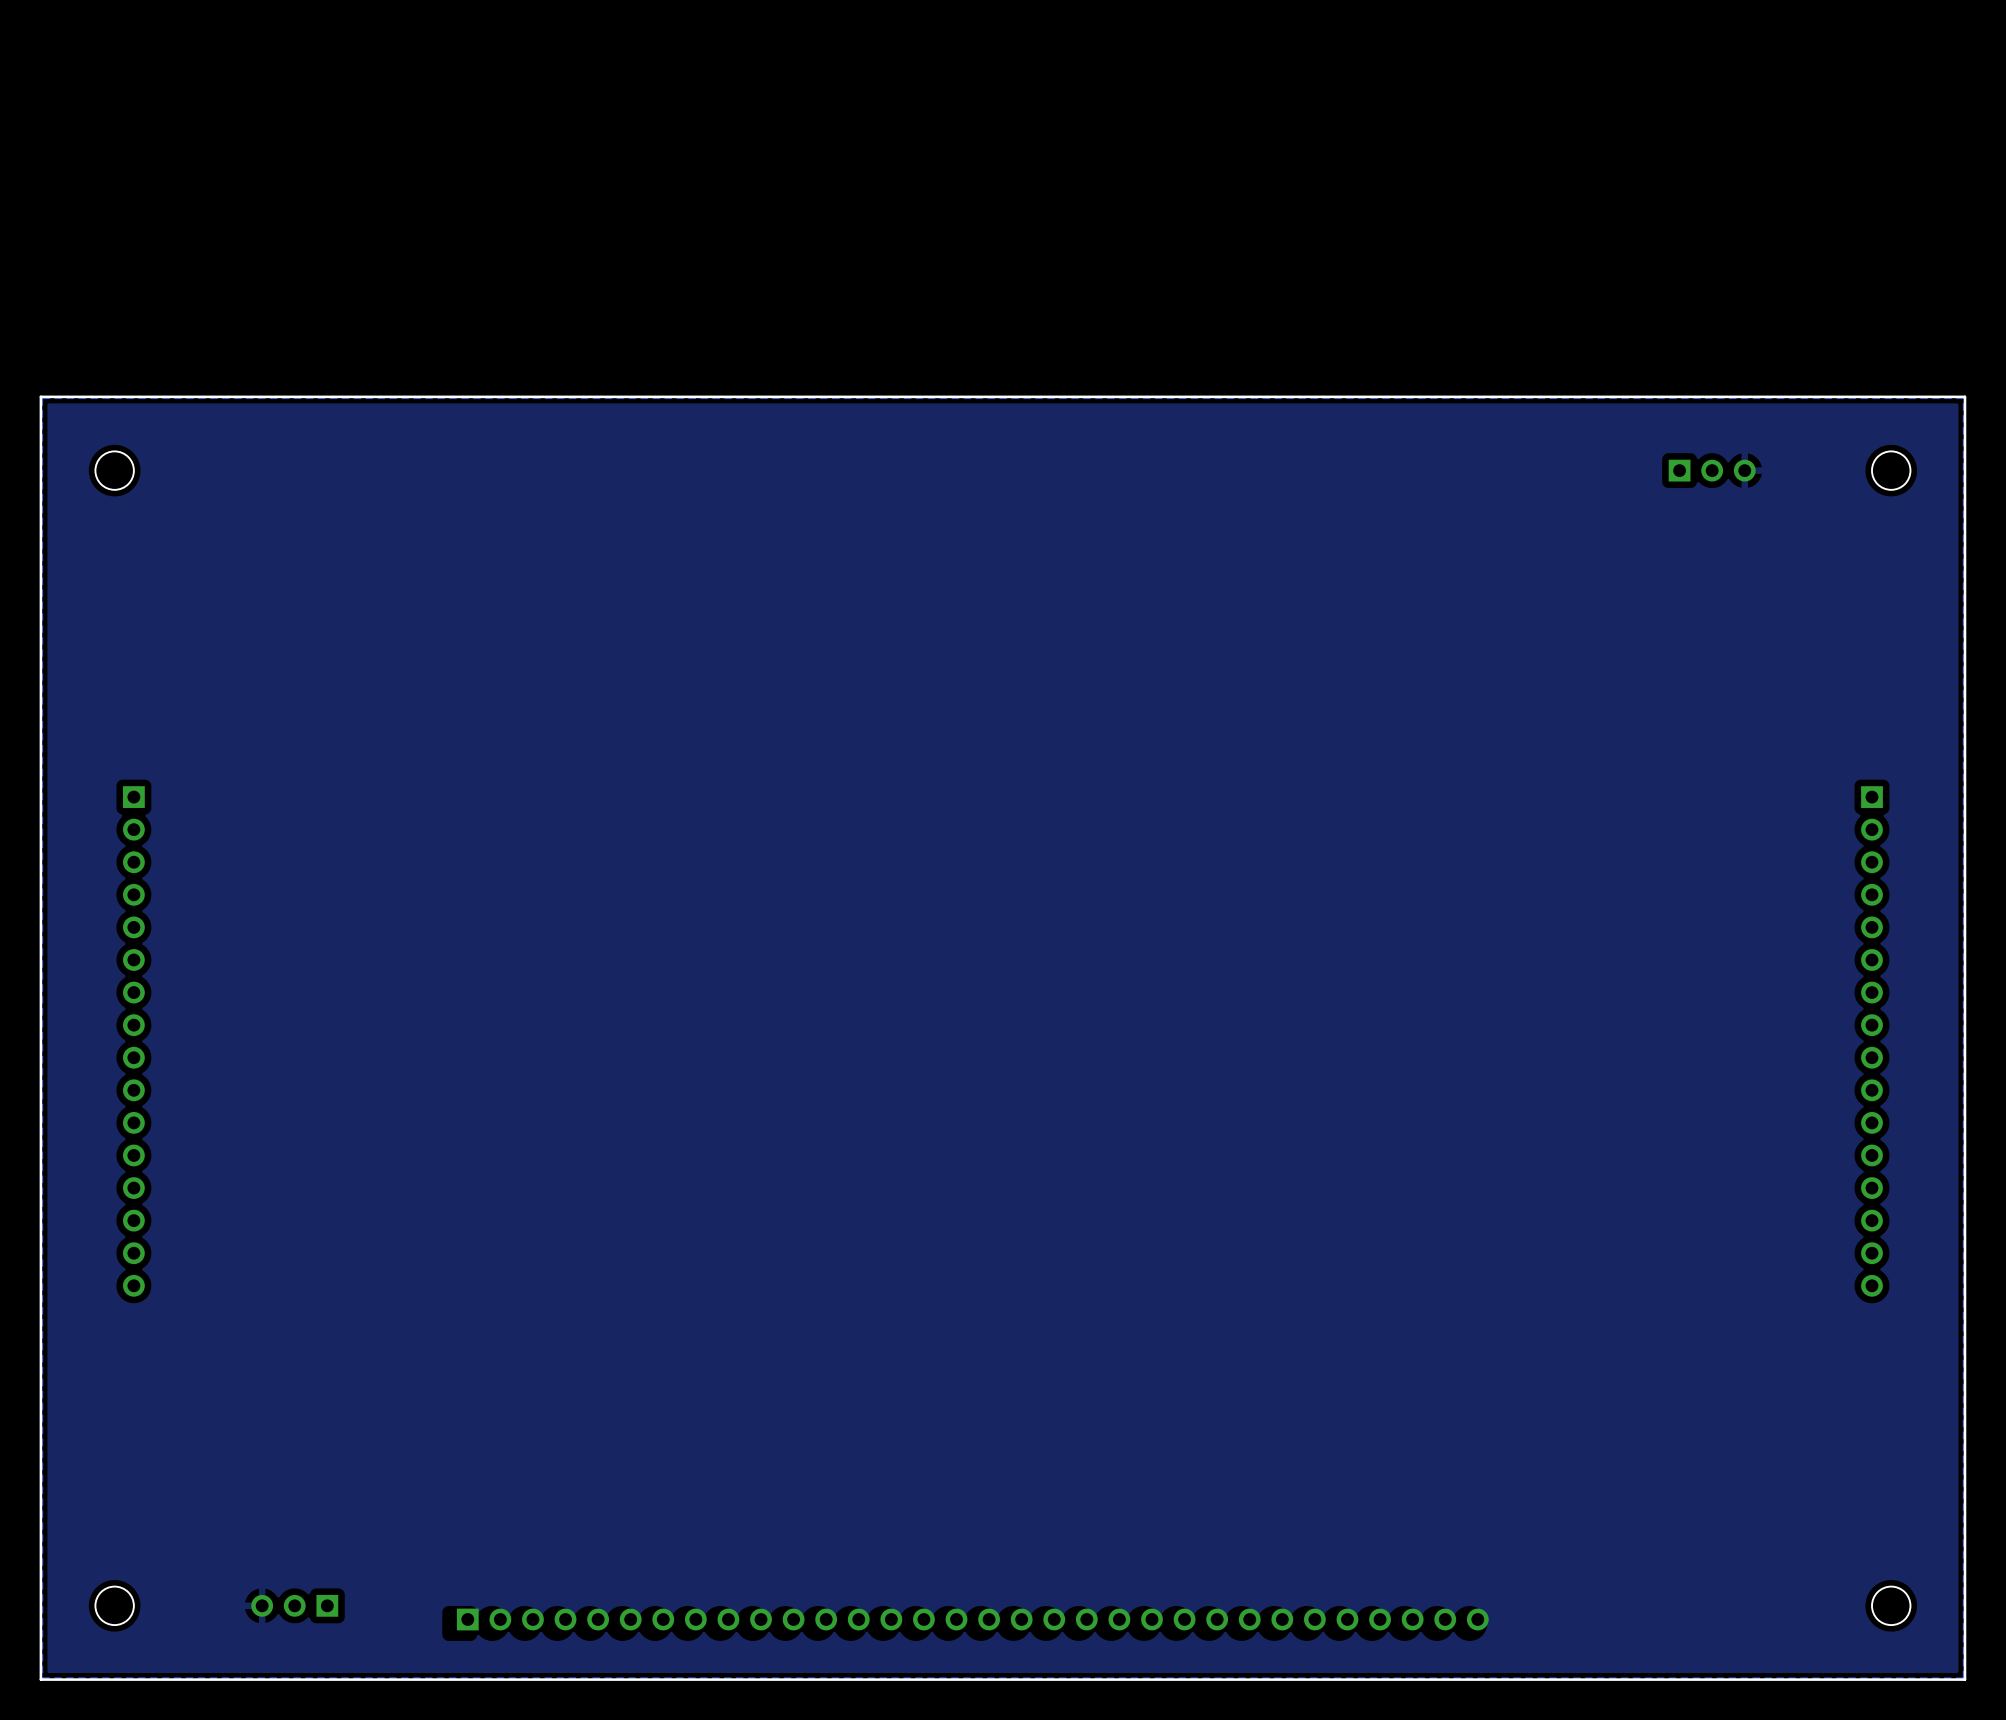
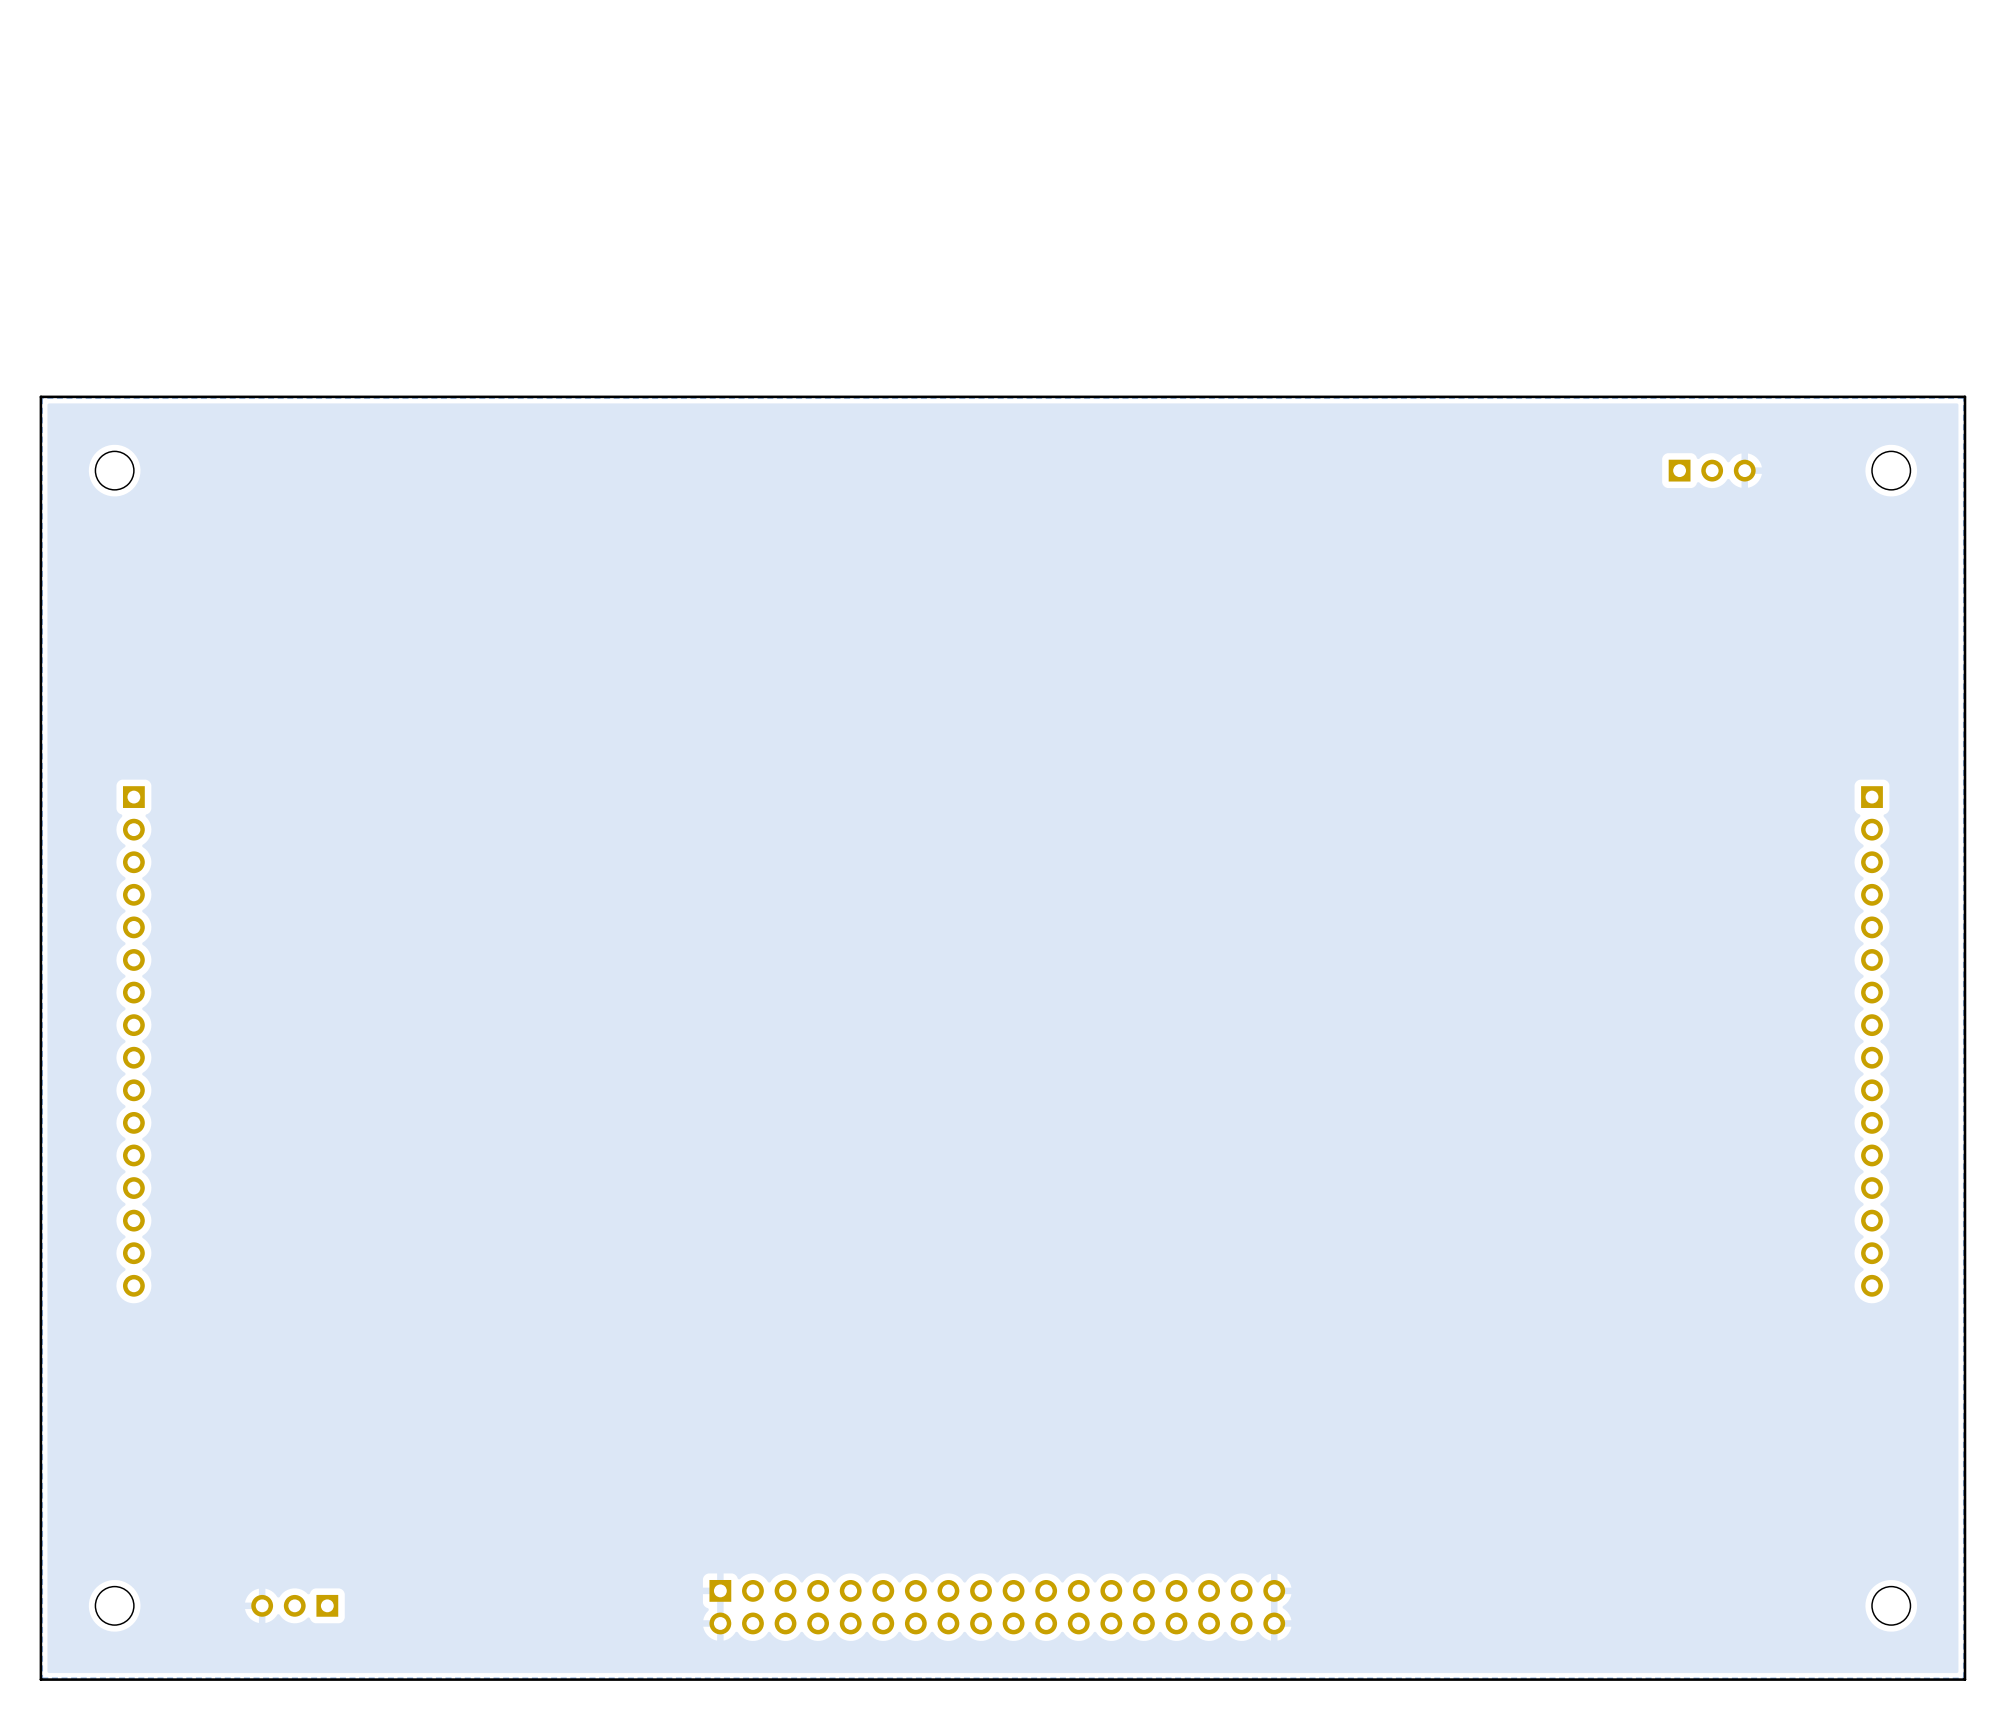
part: none -> (997, 1607)
part: (972, 1619) -> none

